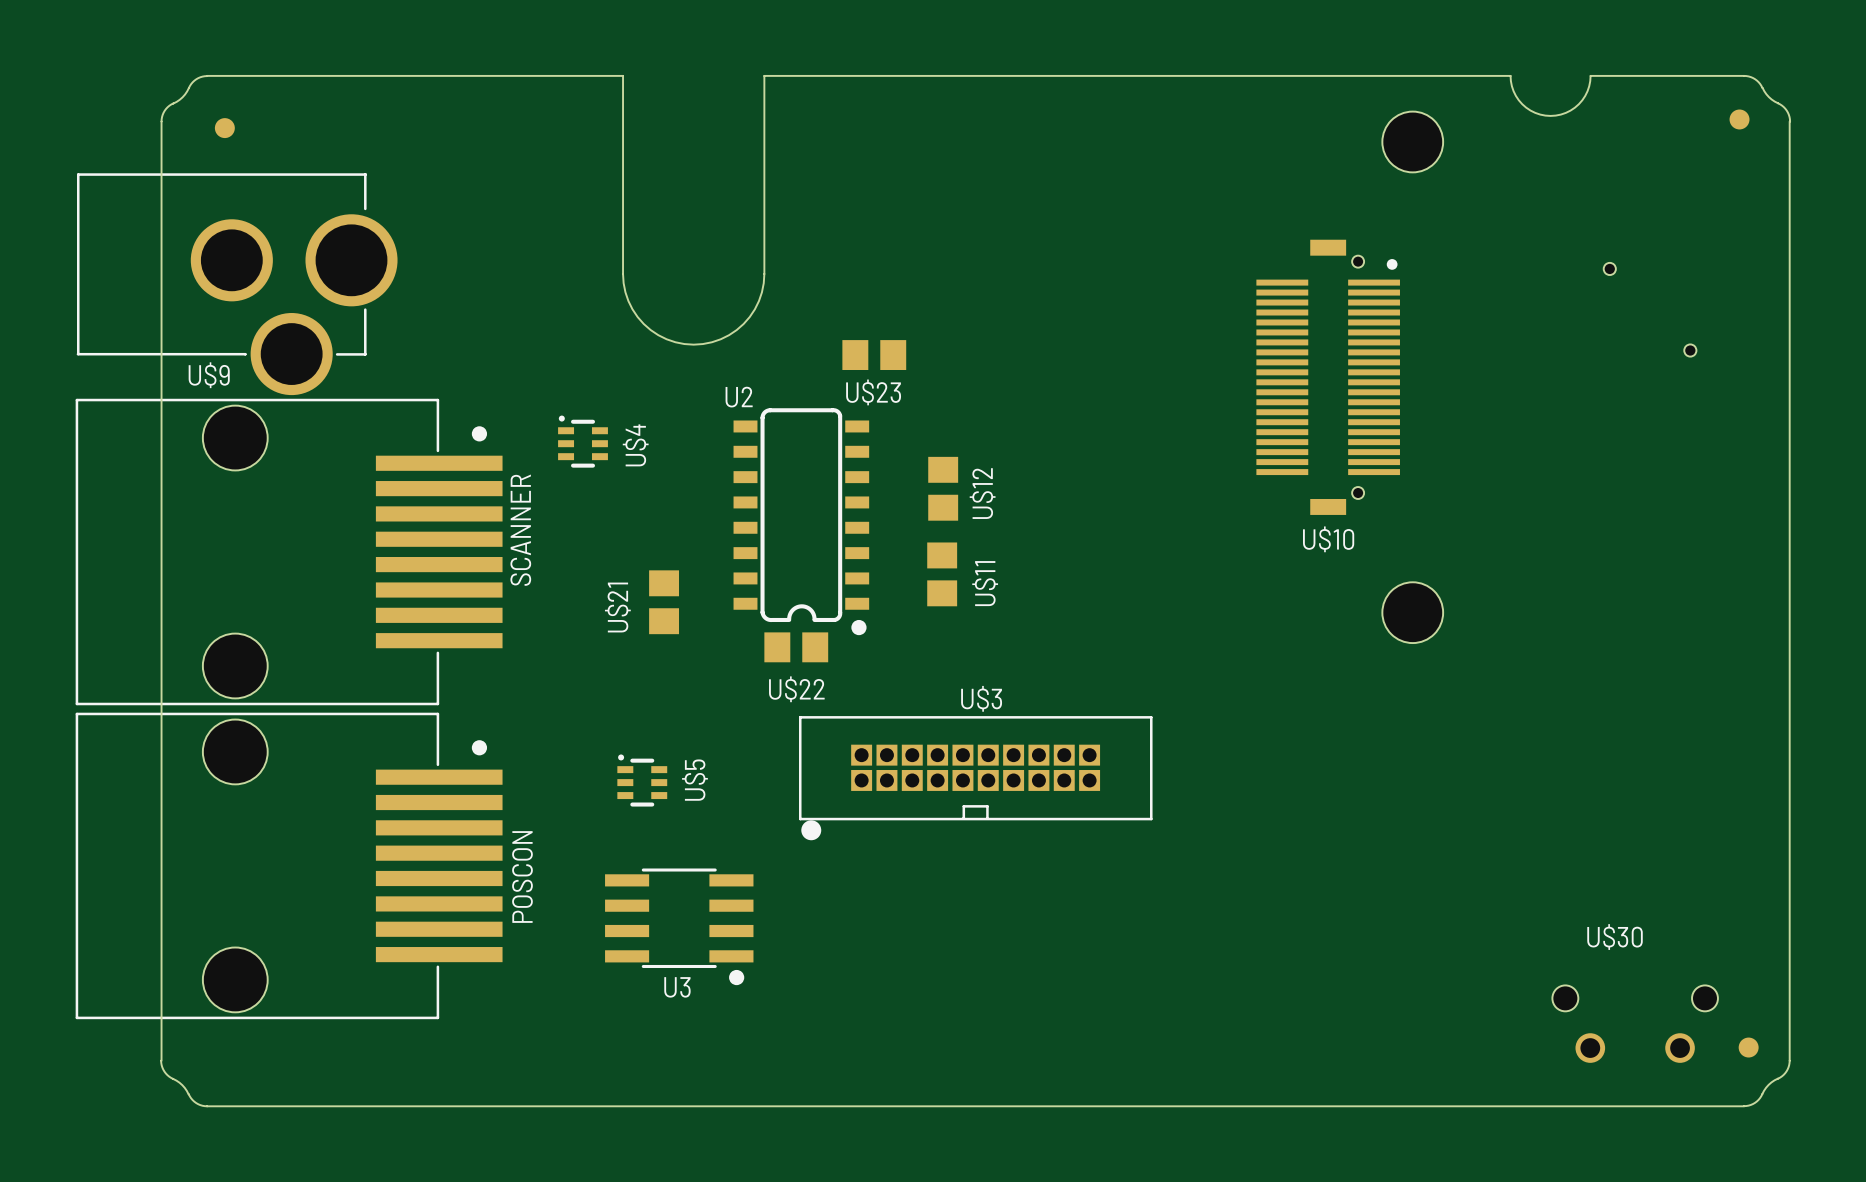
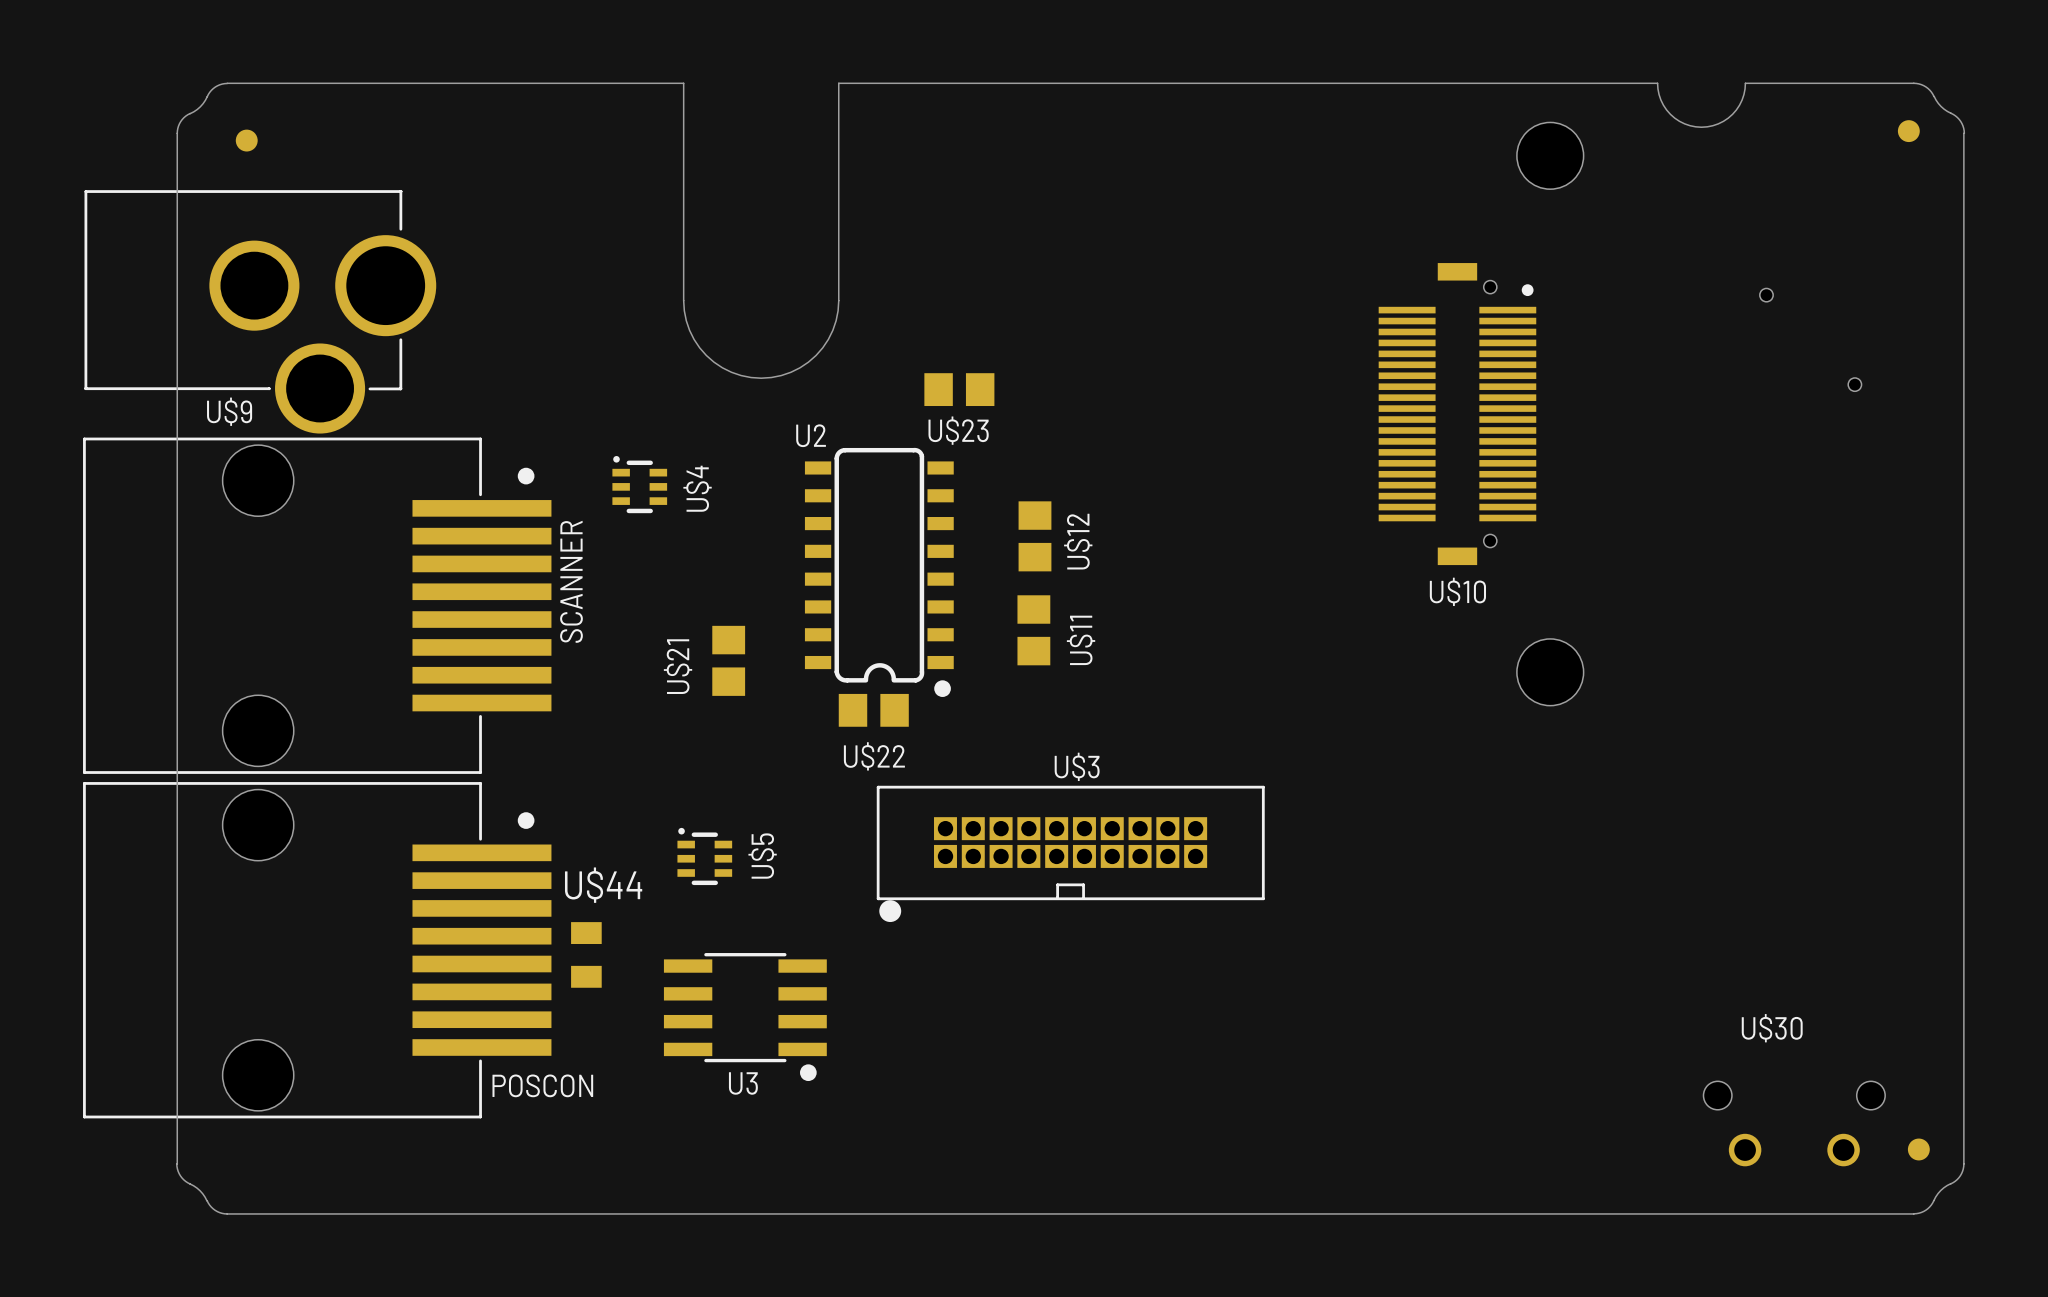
U$44: none -> (586, 954)
POSCON name rotation: 0° (522, 877) -> 90° clockwise (542, 1085)
POSCON name position: POSCON (522, 877) -> POSCON (542, 1085)

